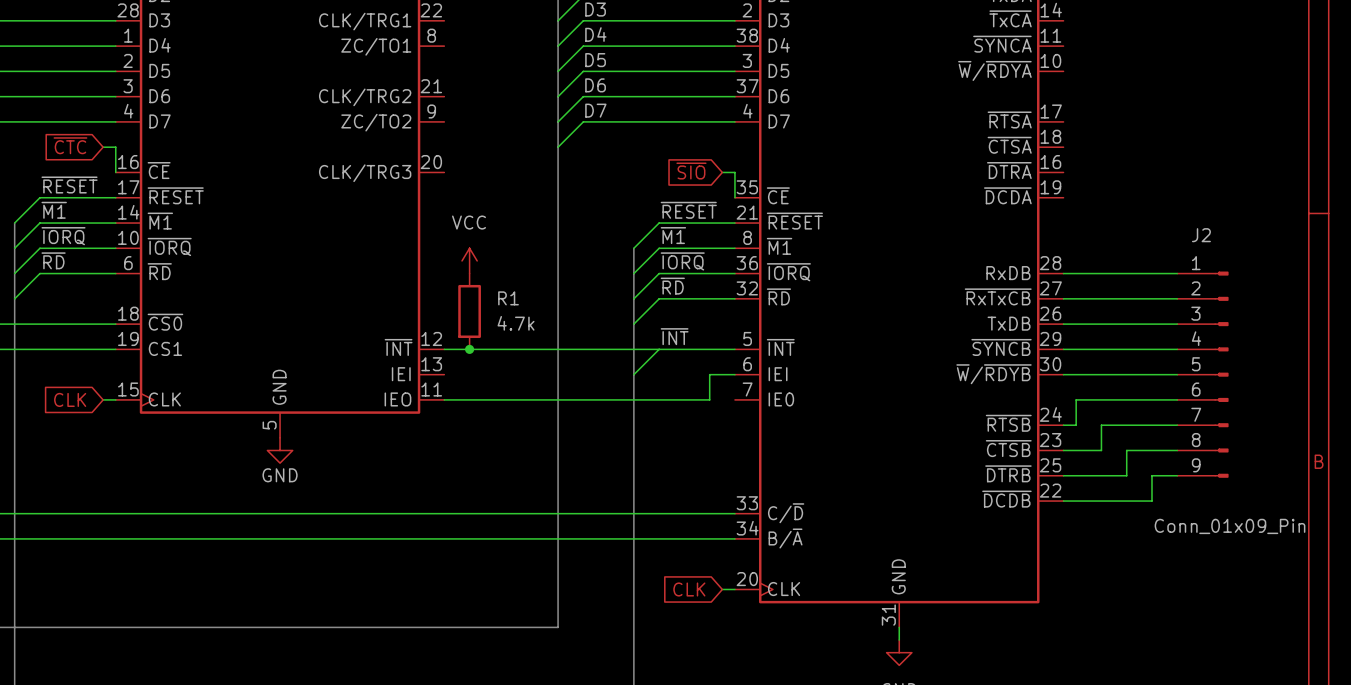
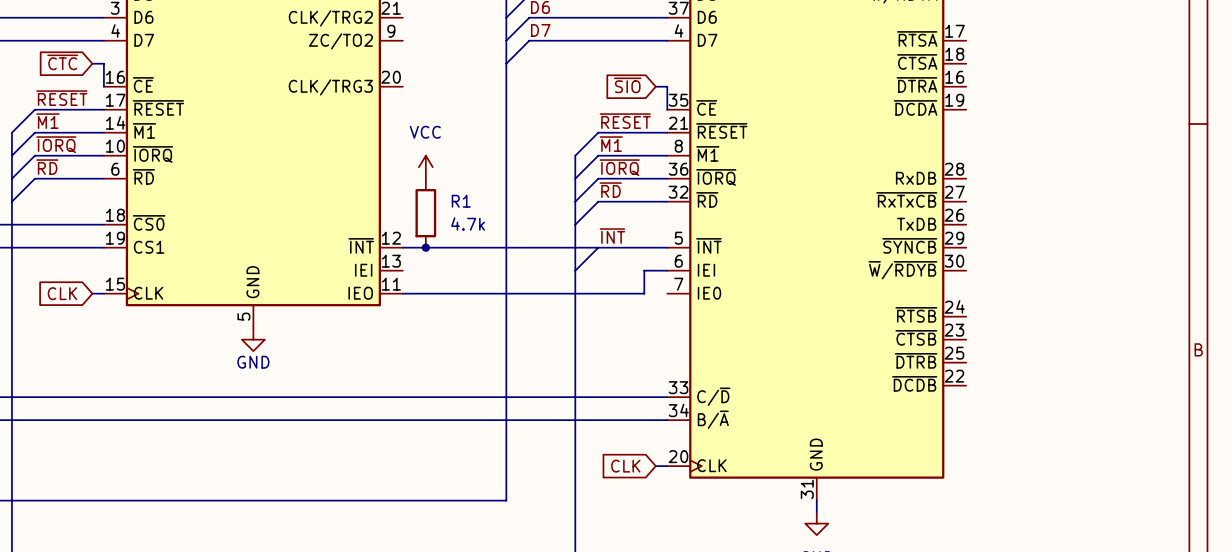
wire: (1063, 273) (1177, 273) -> none
wire: (1063, 298) (1177, 298) -> none
wire: (1063, 324) (1177, 324) -> none
wire: (1063, 349) (1177, 349) -> none
wire: (1063, 374) (1177, 374) -> none
J2: Conn_01x09_Pin (1202, 374) -> none
wire: (1177, 399) (1076, 399) (1076, 425) (1063, 425) -> none
wire: (1177, 425) (1101, 425) (1101, 450) (1063, 450) -> none
wire: (1177, 450) (1126, 450) (1126, 475) (1063, 475) -> none
wire: (1177, 475) (1151, 475) (1151, 501) (1063, 501) -> none

